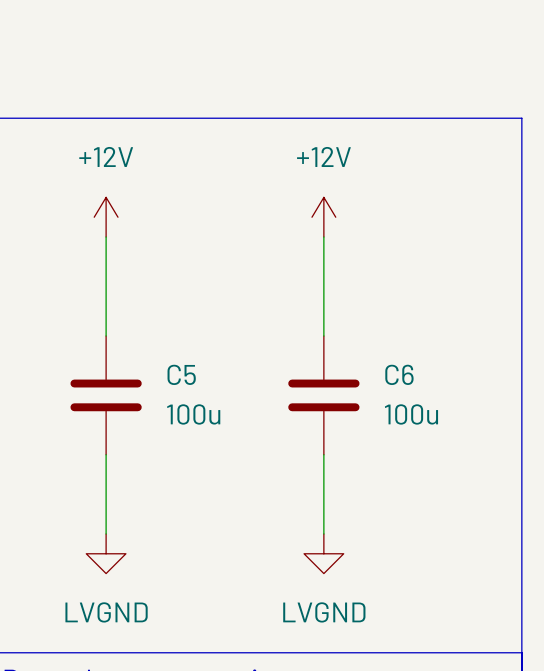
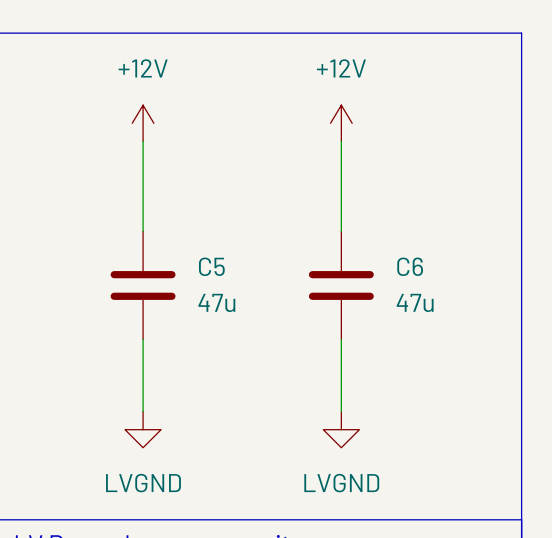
C5 value: 100u (193, 414) -> 47u (216, 302)
C6 value: 100u (411, 414) -> 47u (415, 302)

